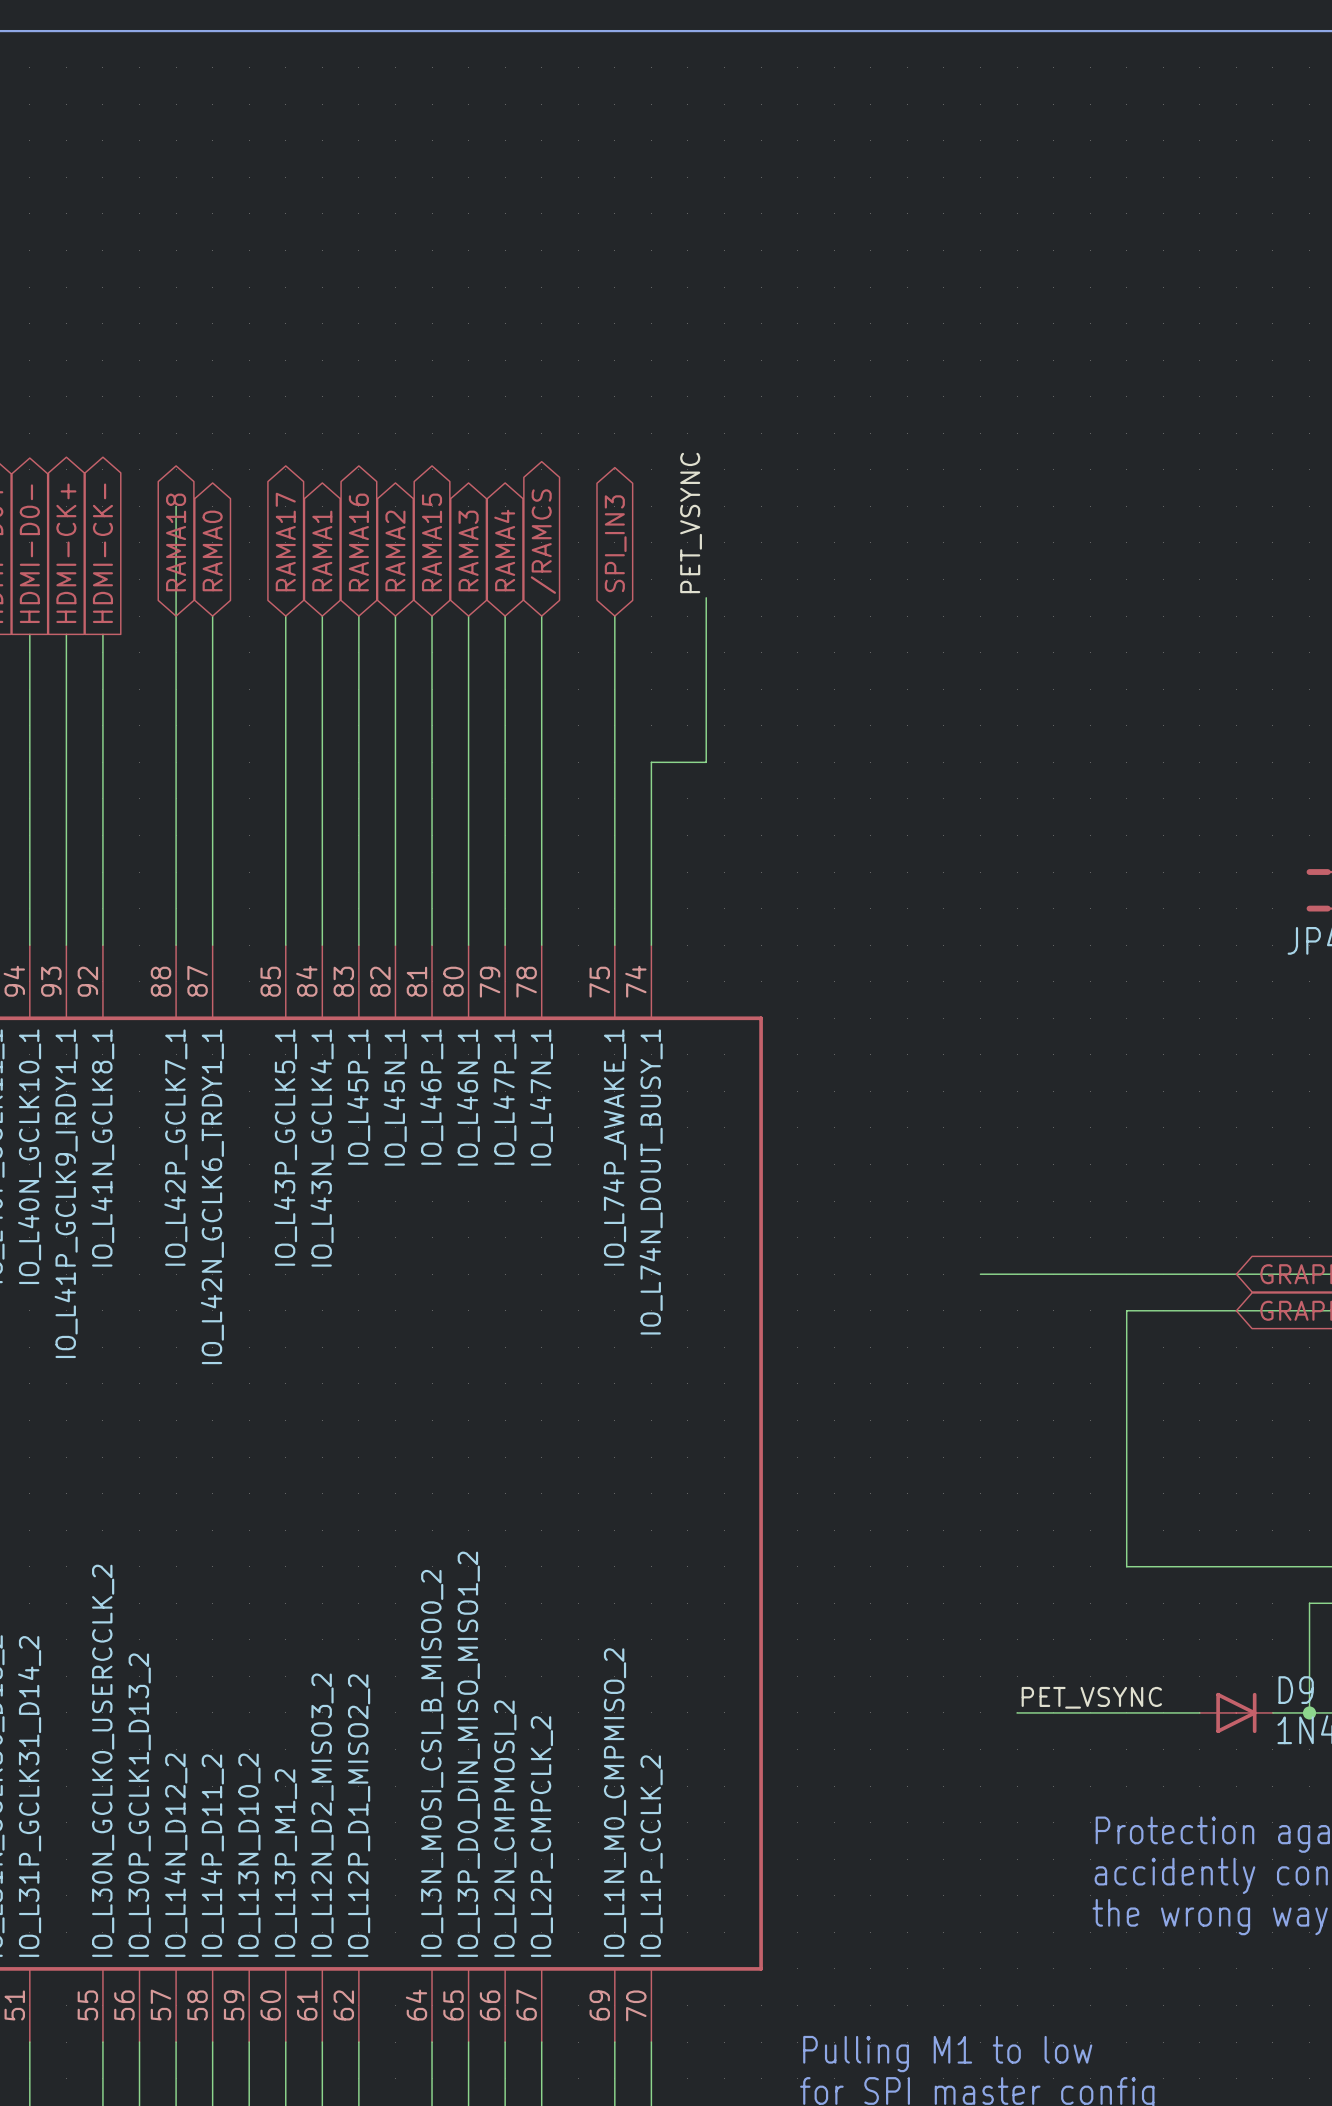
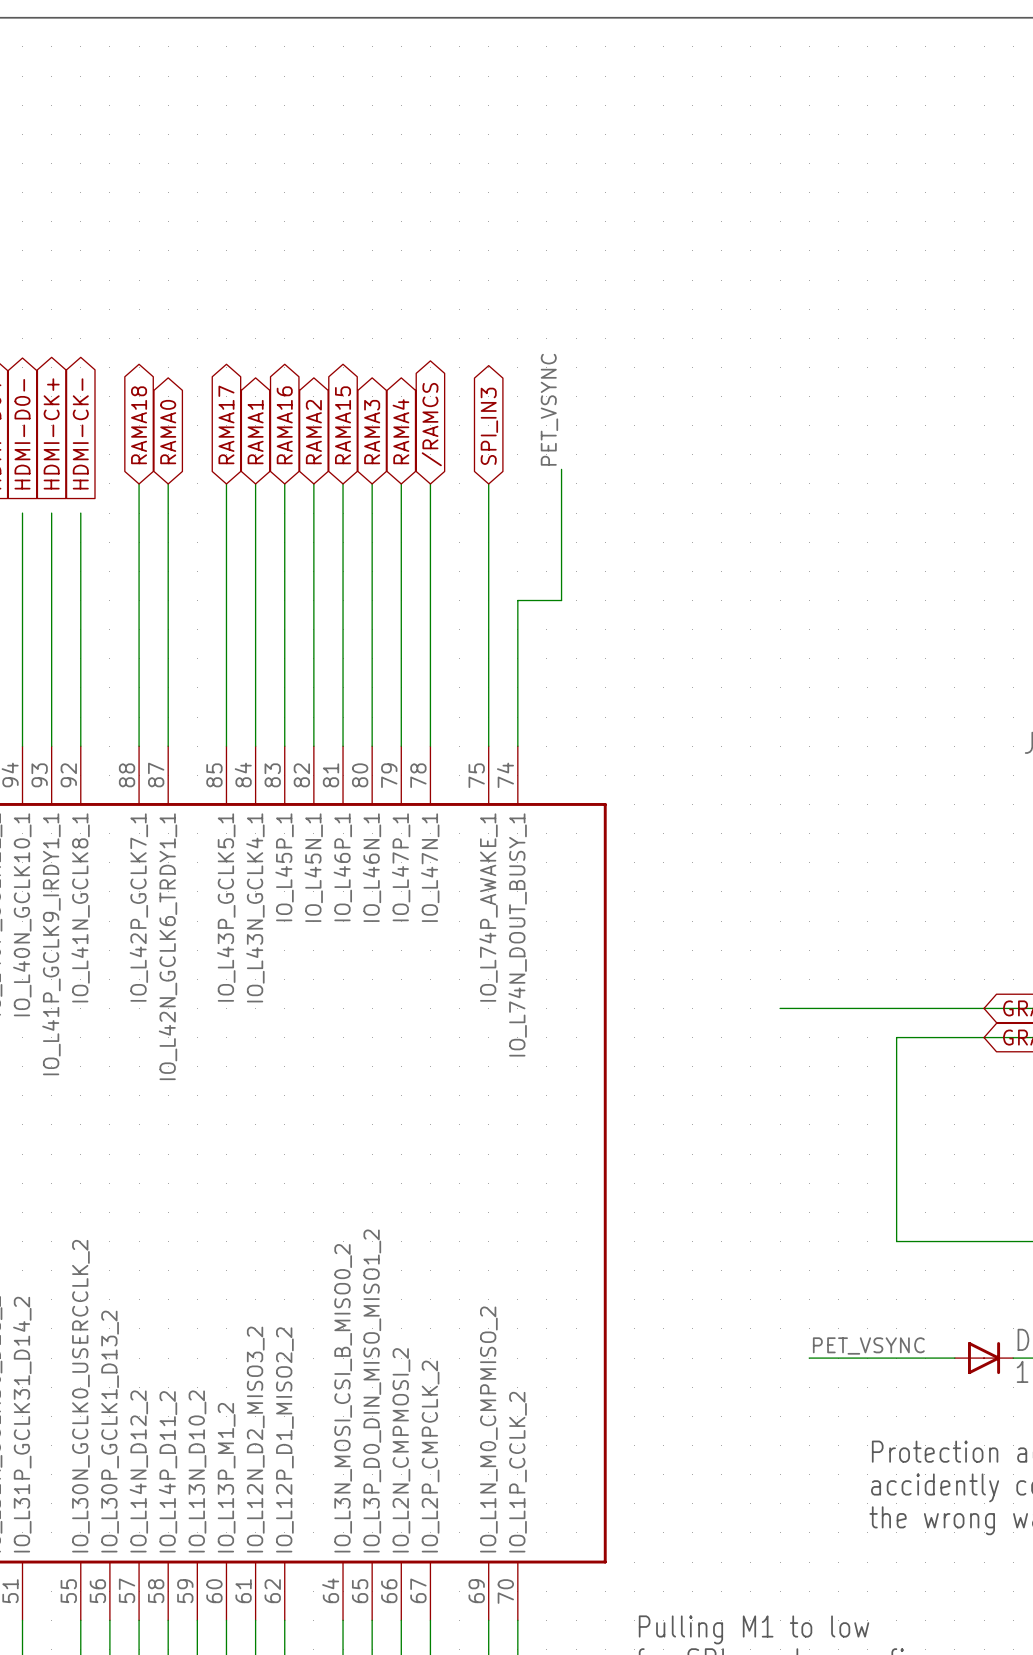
wire: (176, 506) (176, 616) -> none
wire: (29, 634) (29, 652) -> none
wire: (66, 634) (66, 652) -> none
wire: (102, 634) (102, 652) -> none

